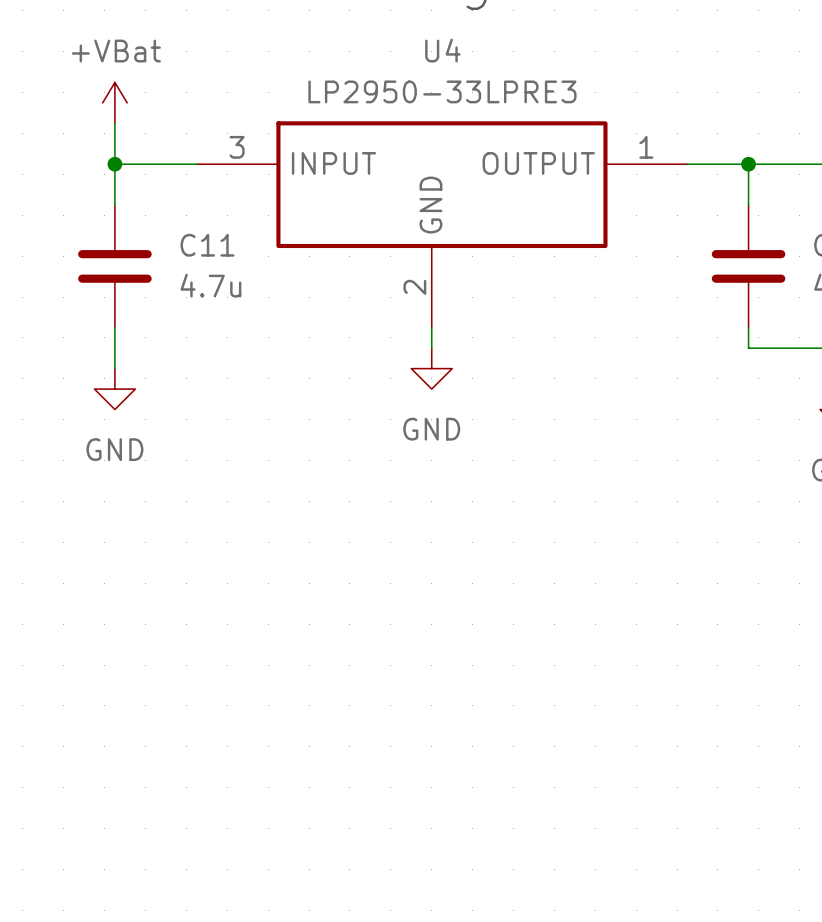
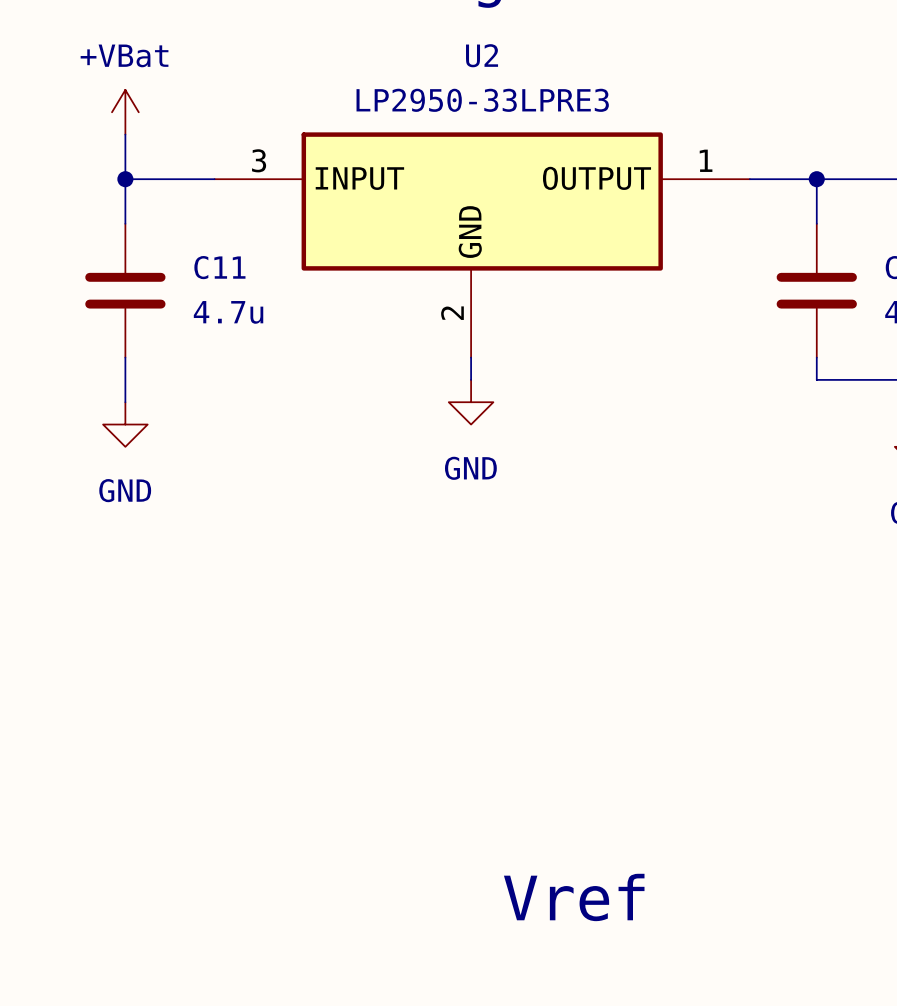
U4 name: U4 (442, 50) -> U2 (482, 55)
text: none -> Vref (574, 897)

